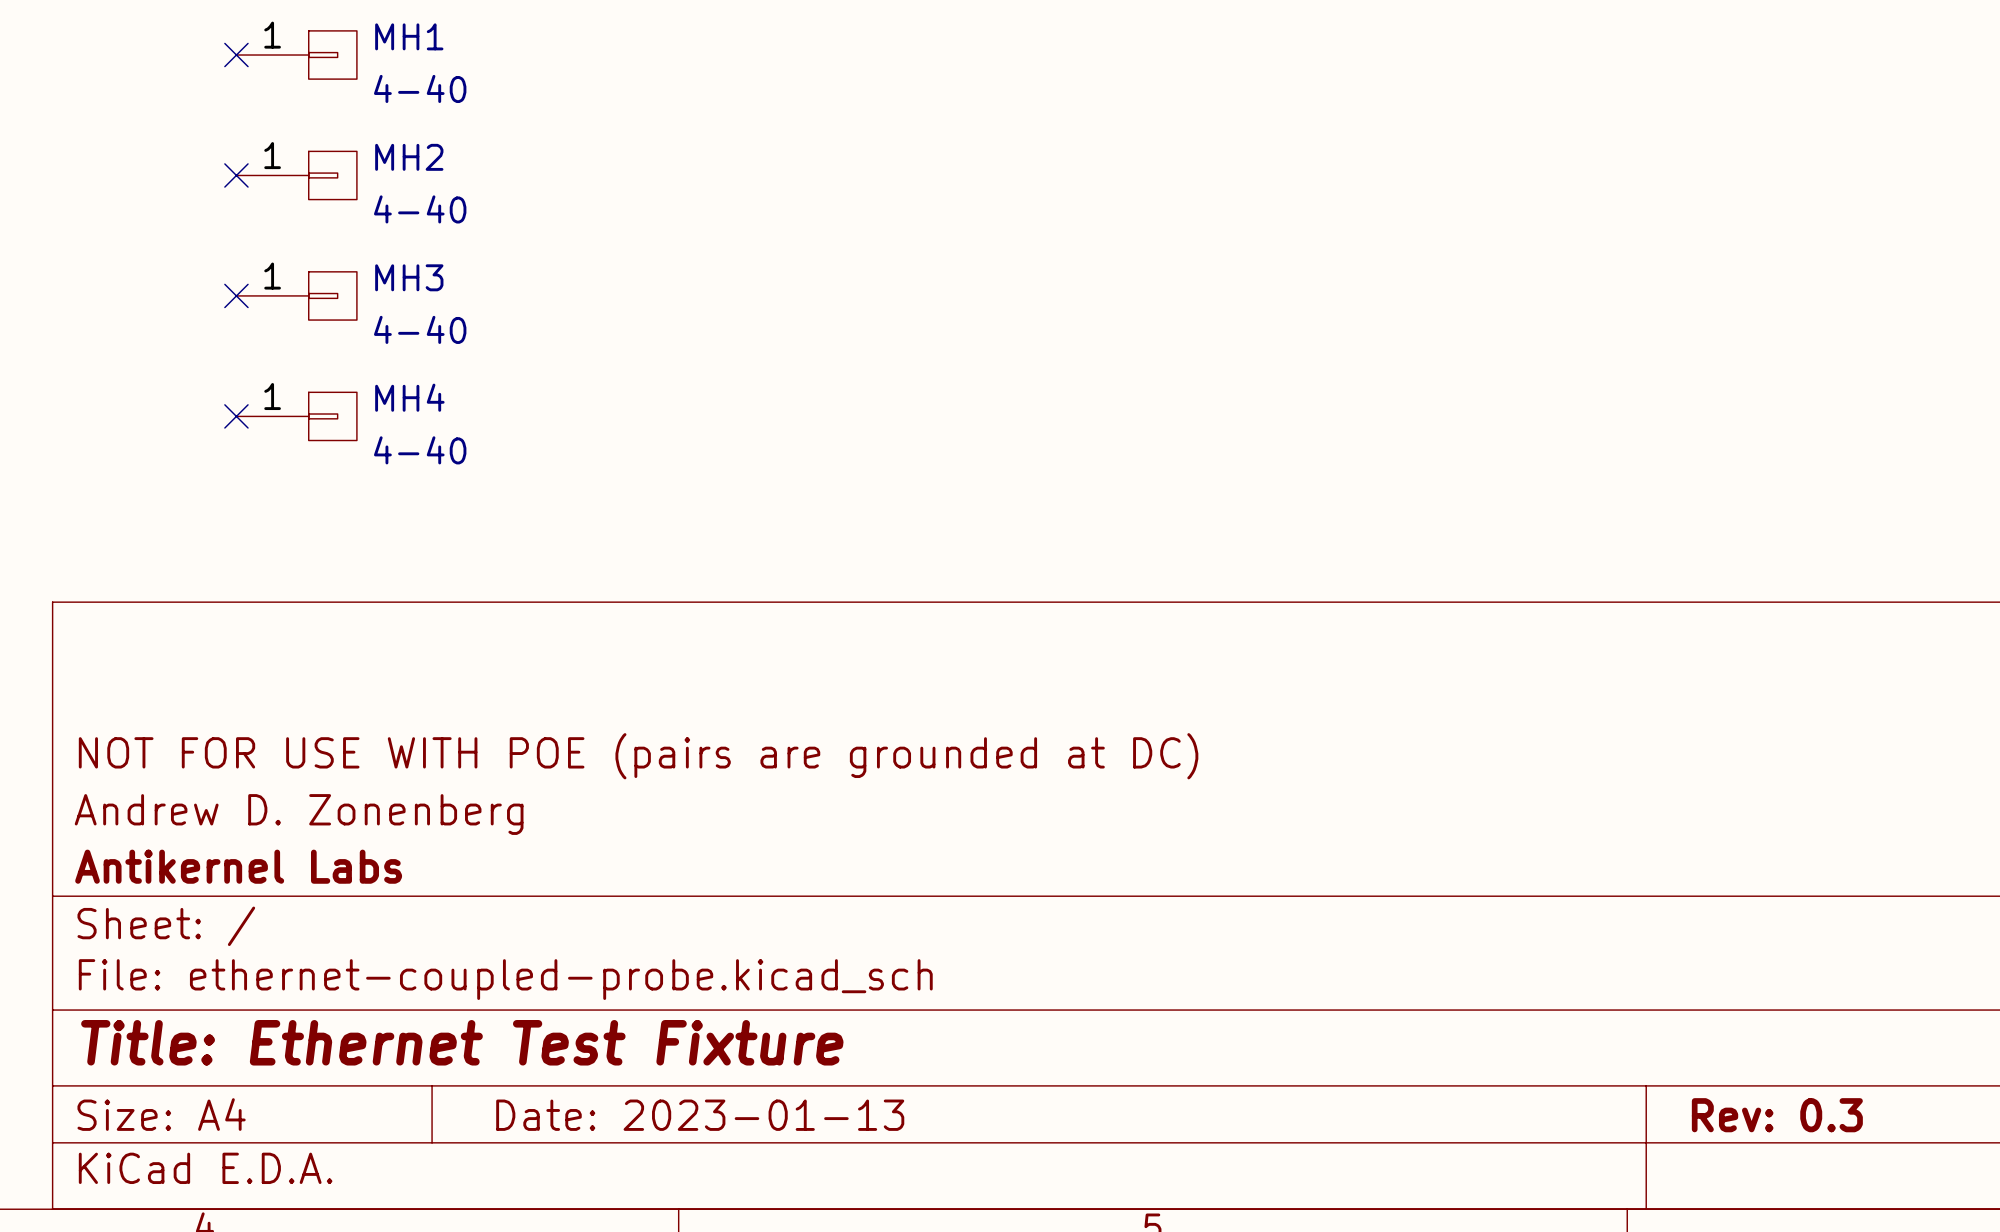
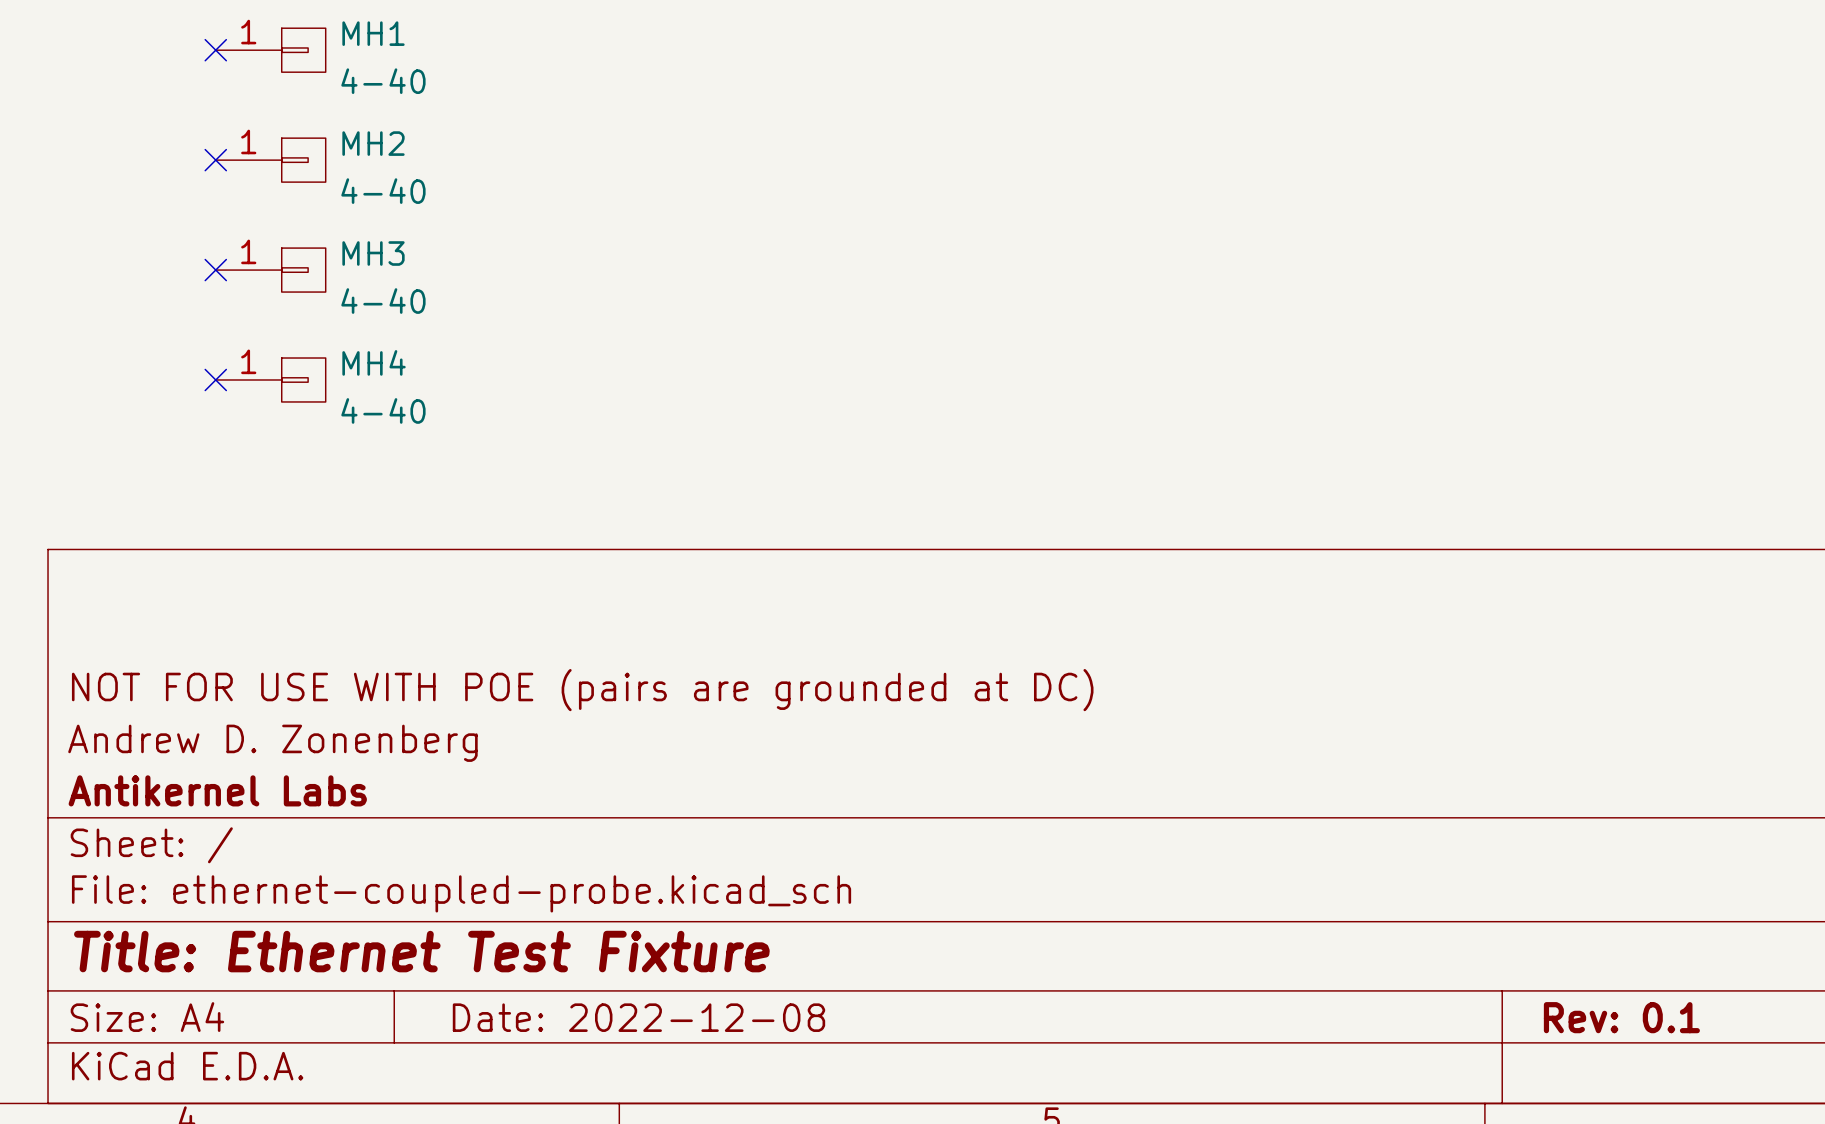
title block: Date: 2023-01-13 (700, 1115) -> Date: 2022-12-08 (638, 1017)
title block: Rev: 0.3 (1777, 1115) -> Rev: 0.1 (1621, 1017)

